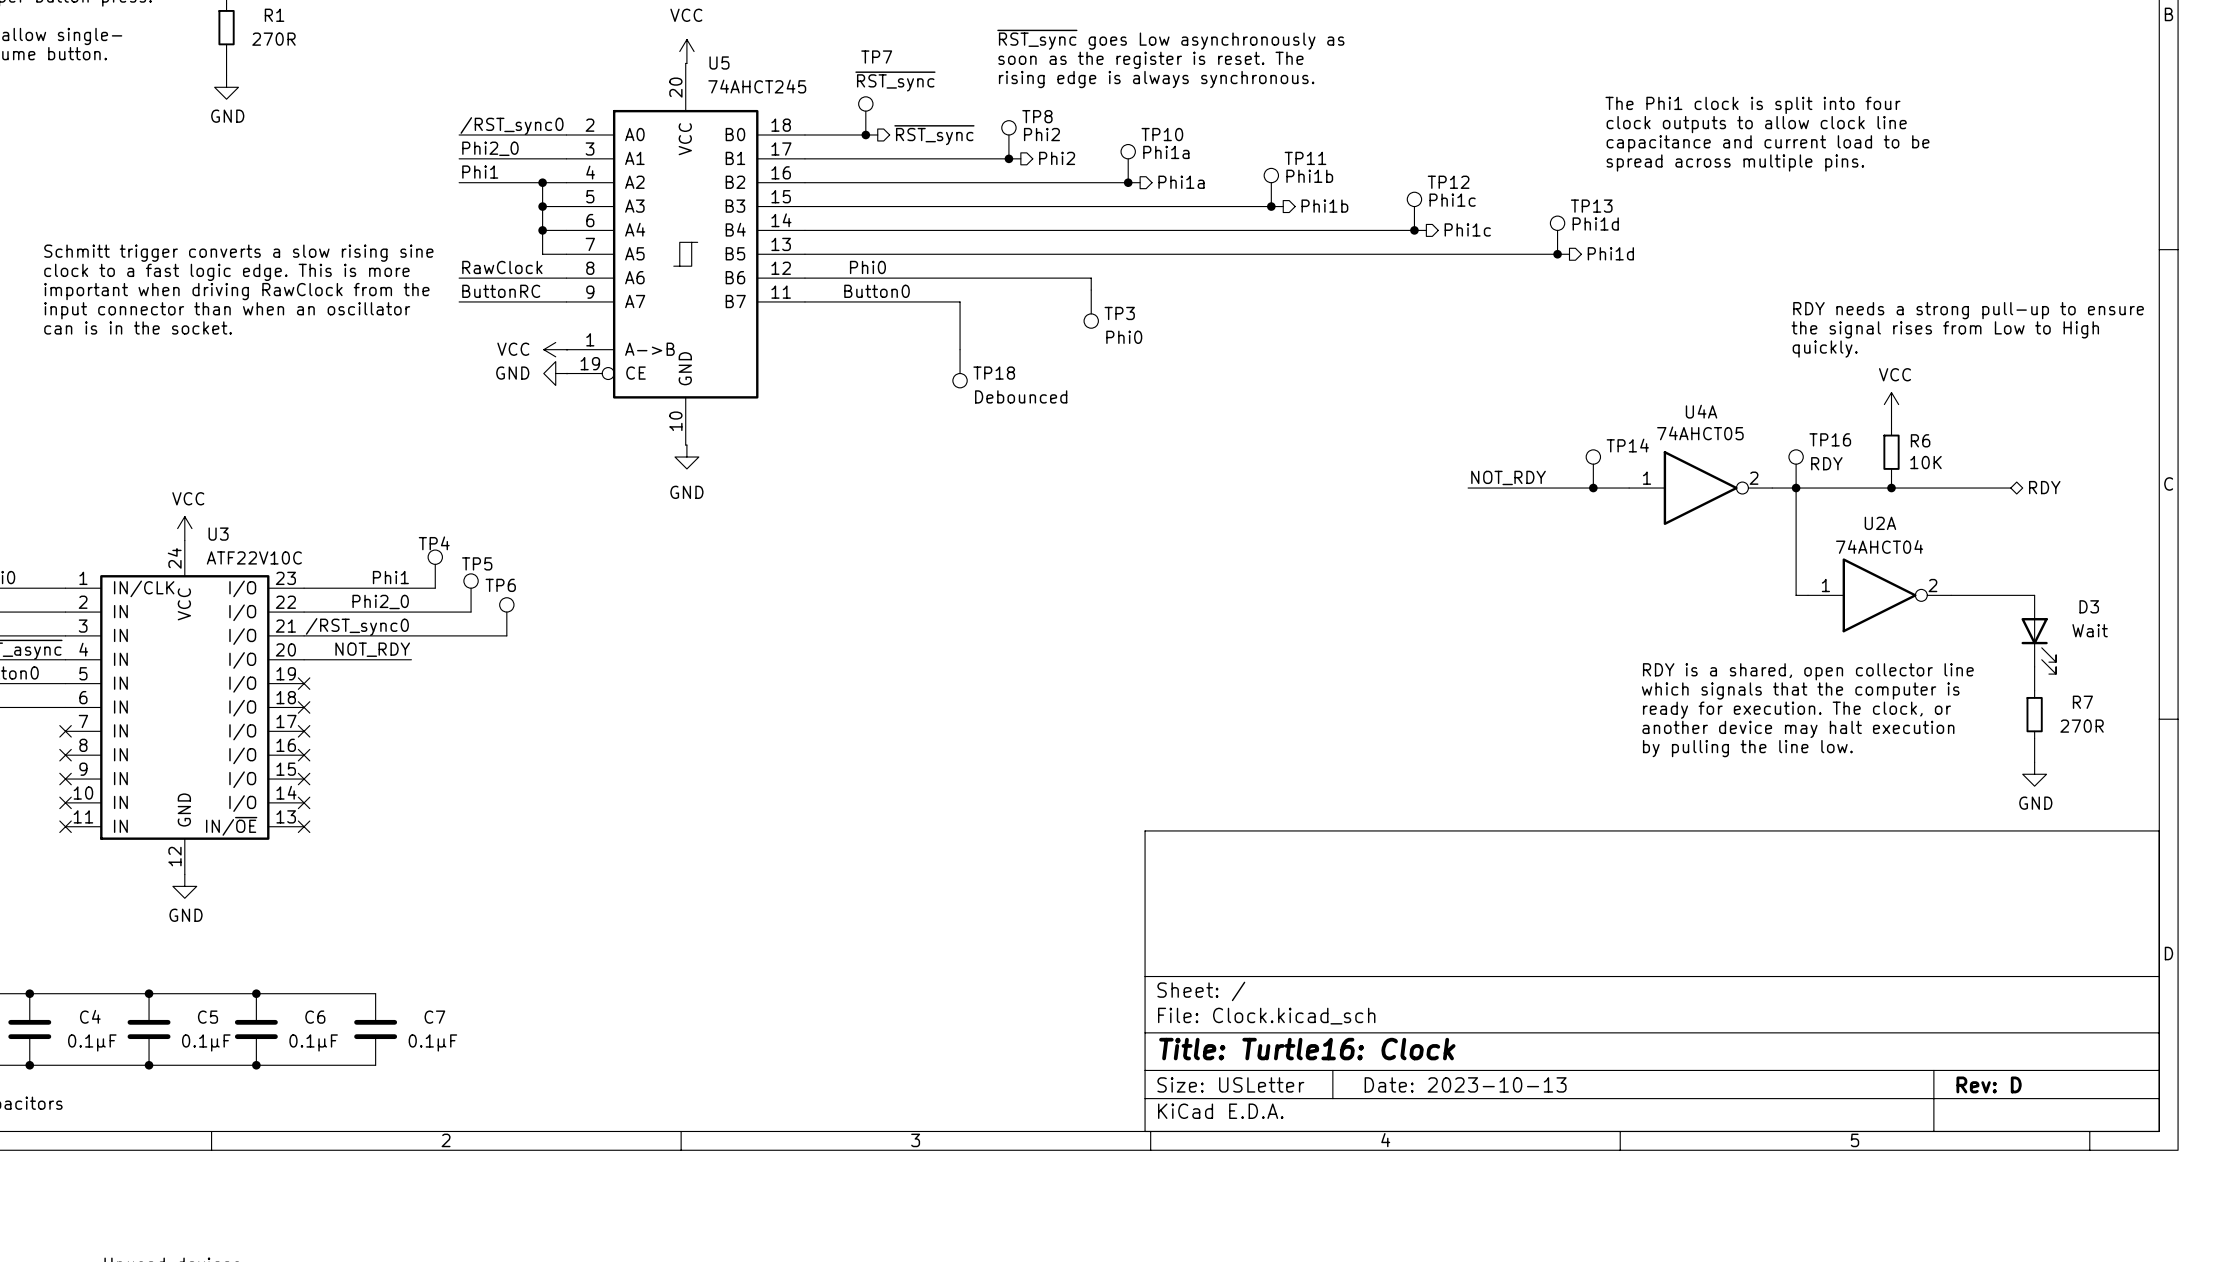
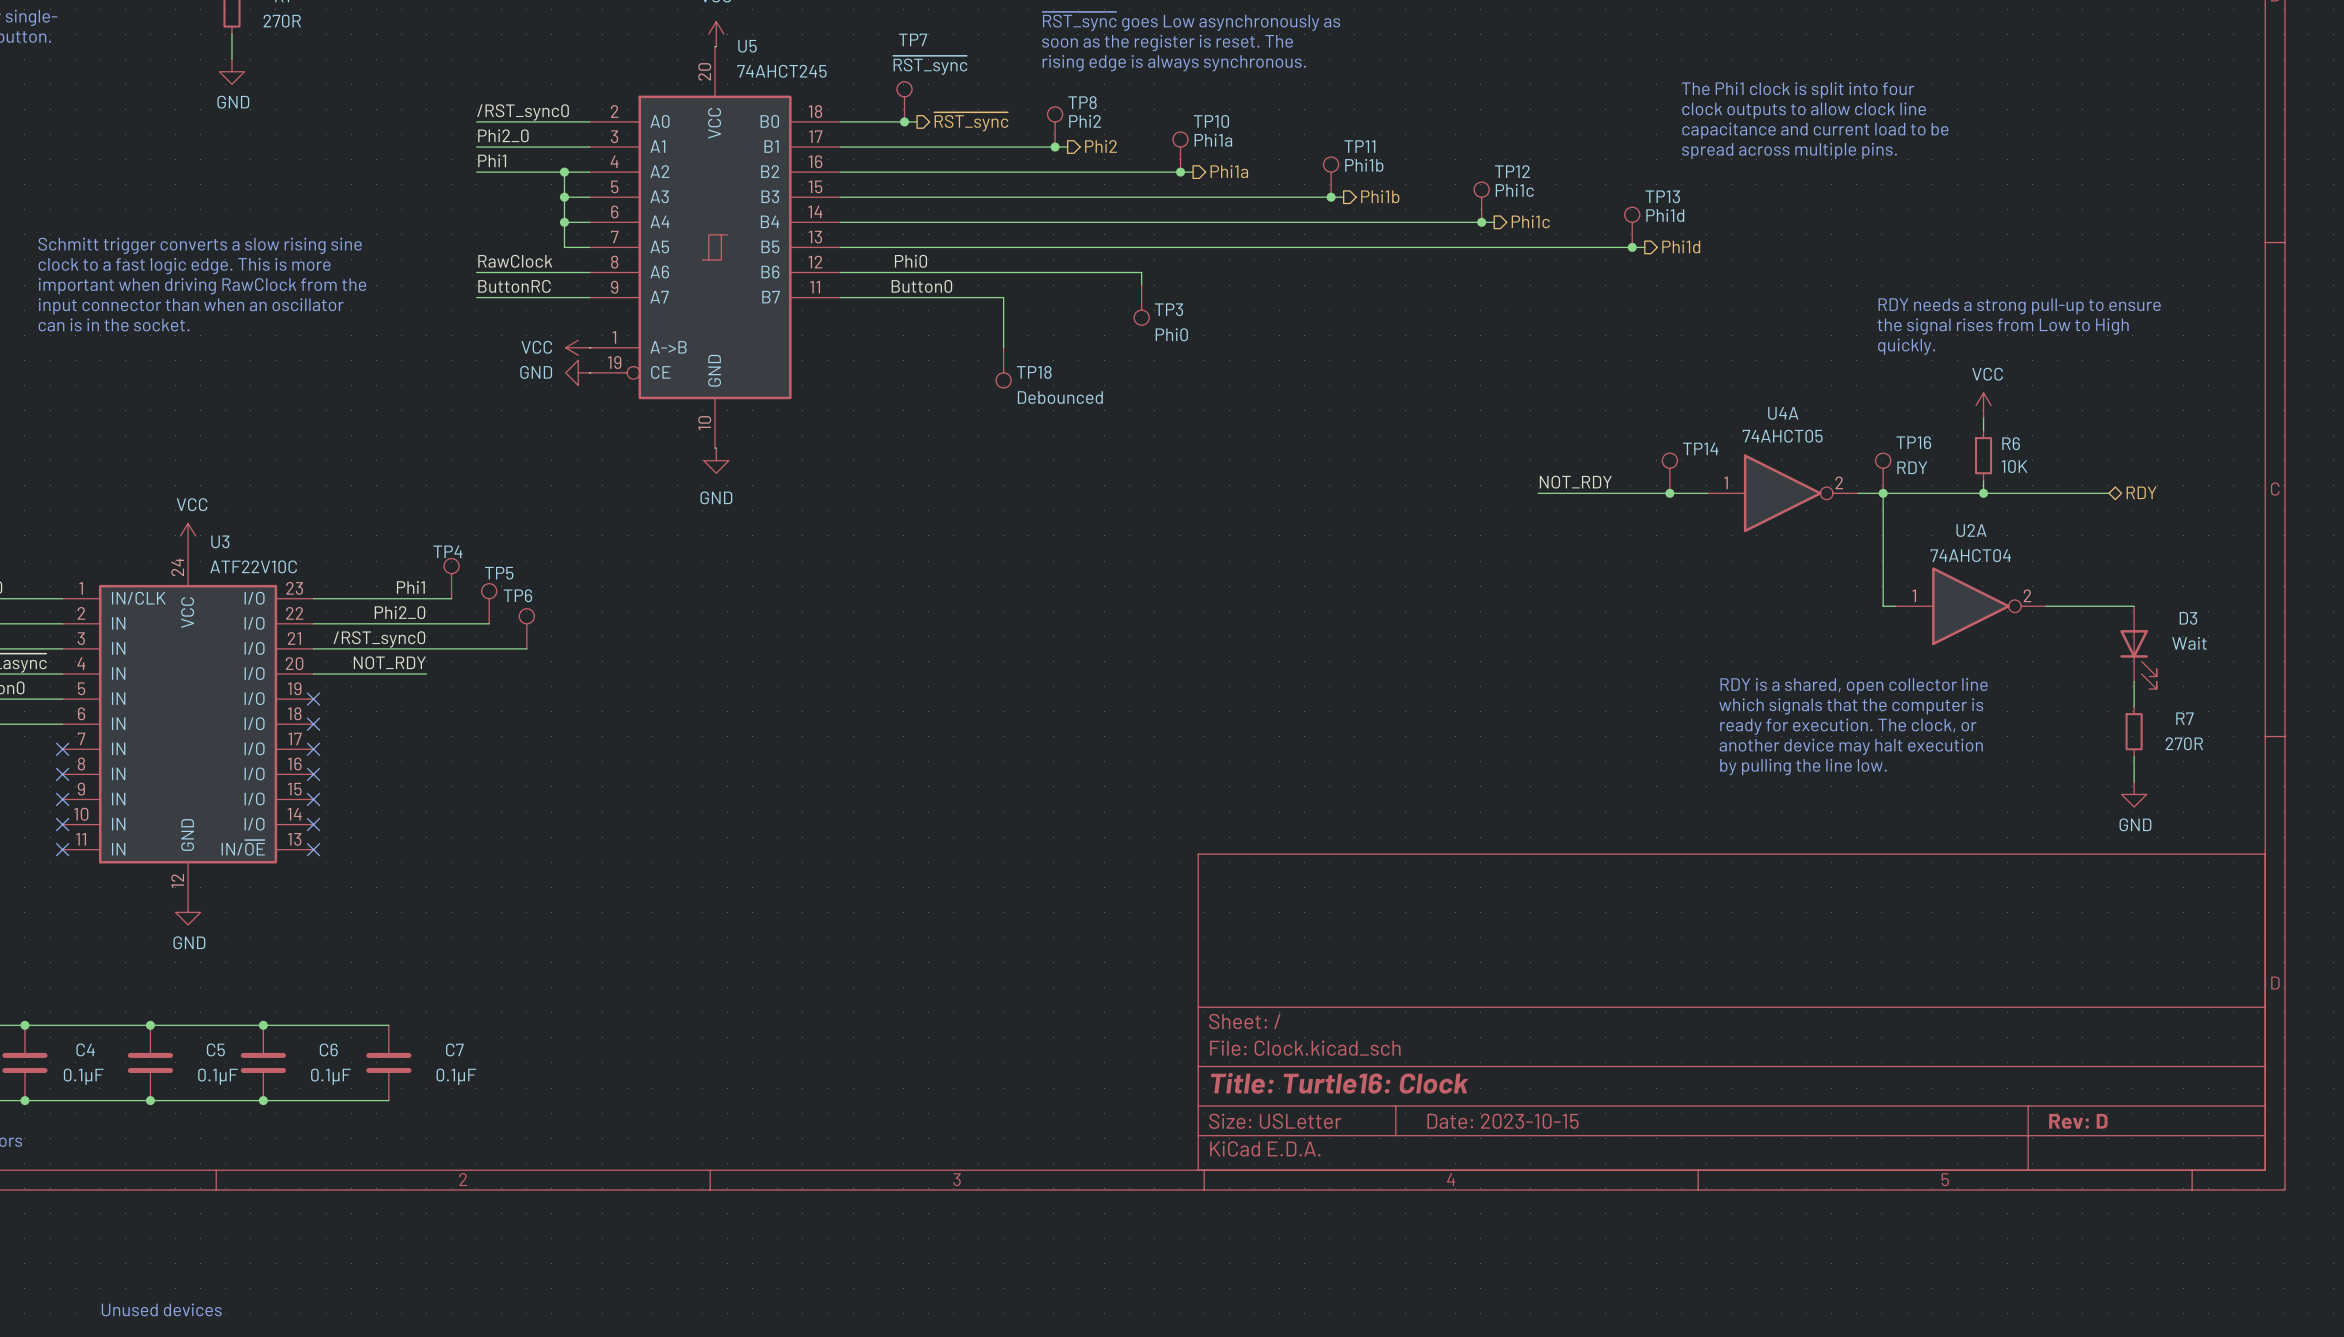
title block: Date: 2023-10-13 (1465, 1084) -> Date: 2023-10-15 (1503, 1121)

